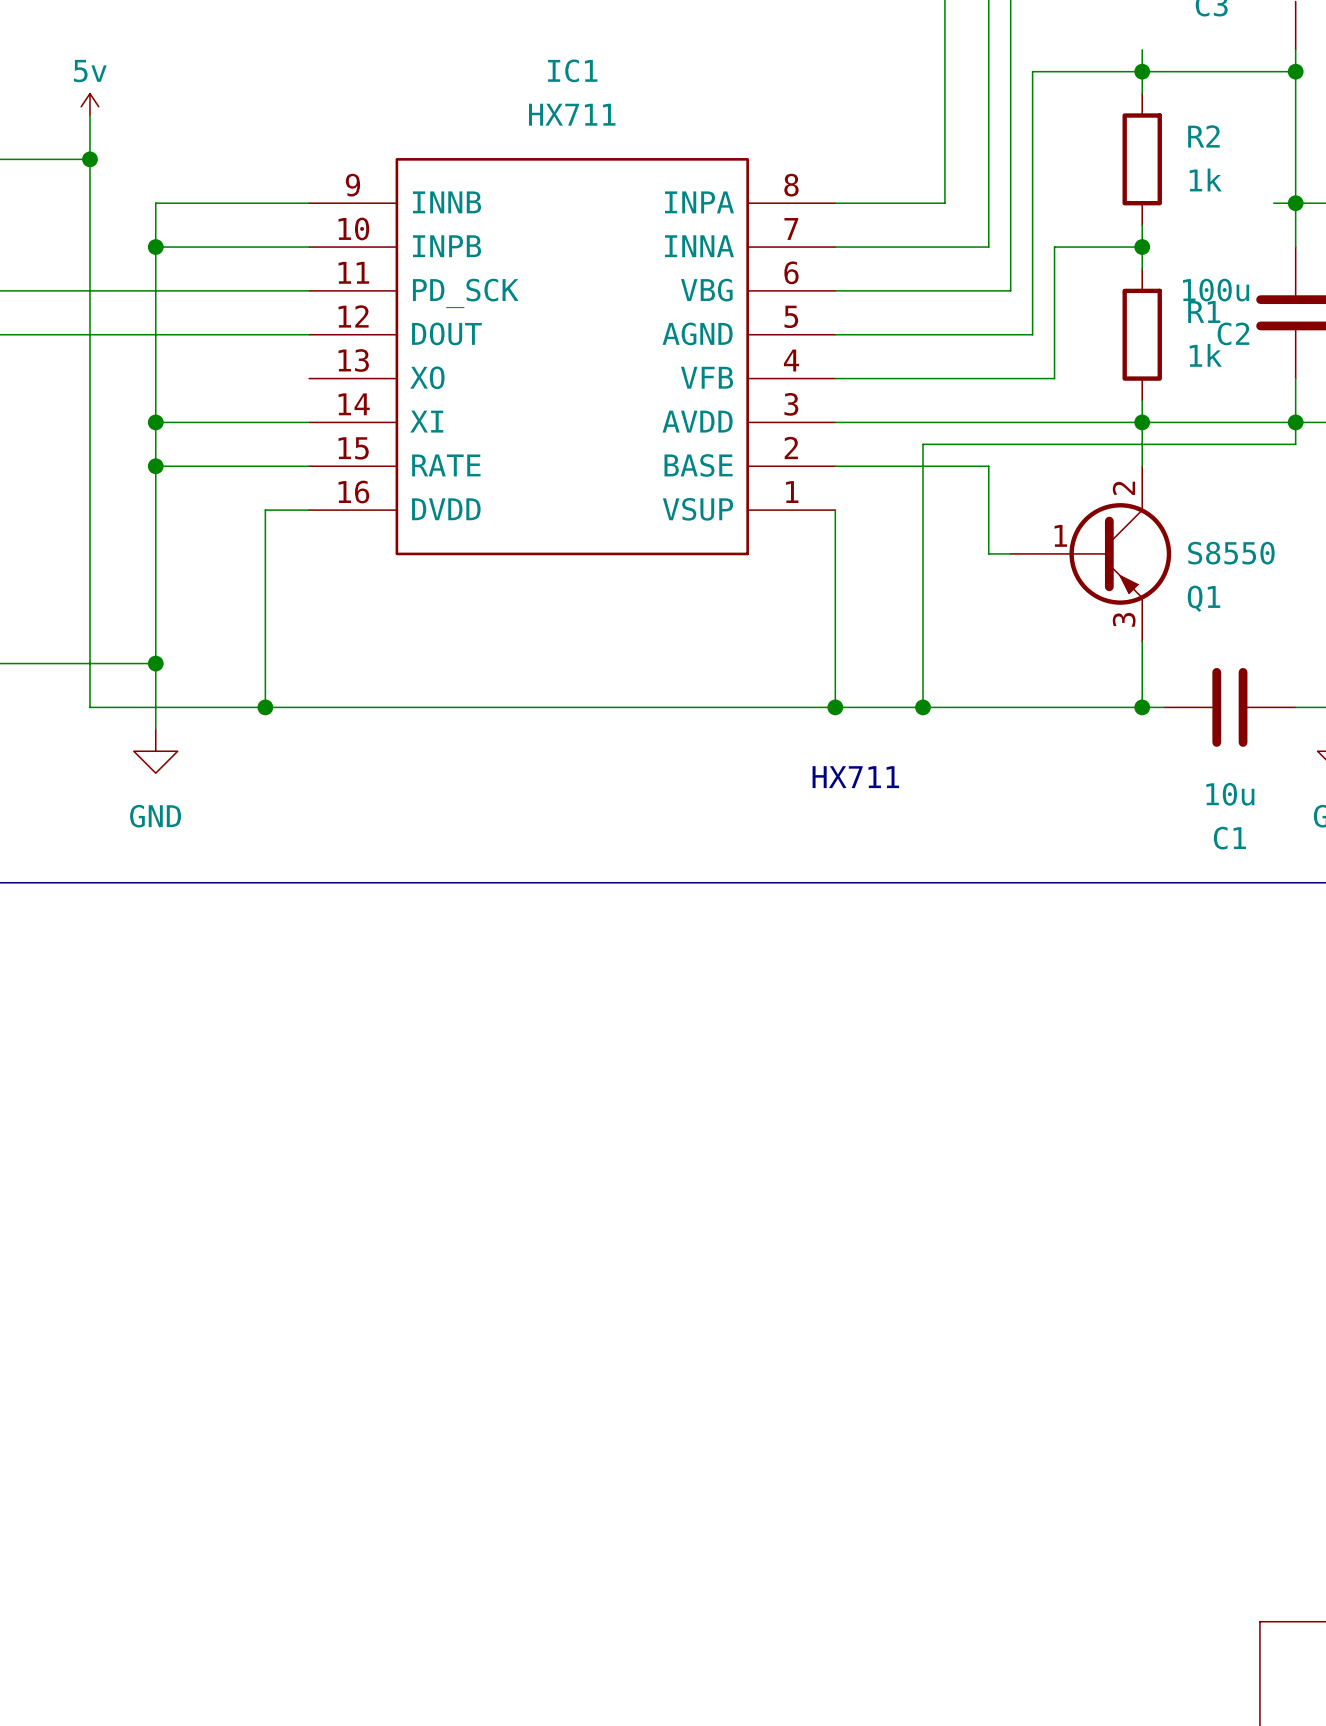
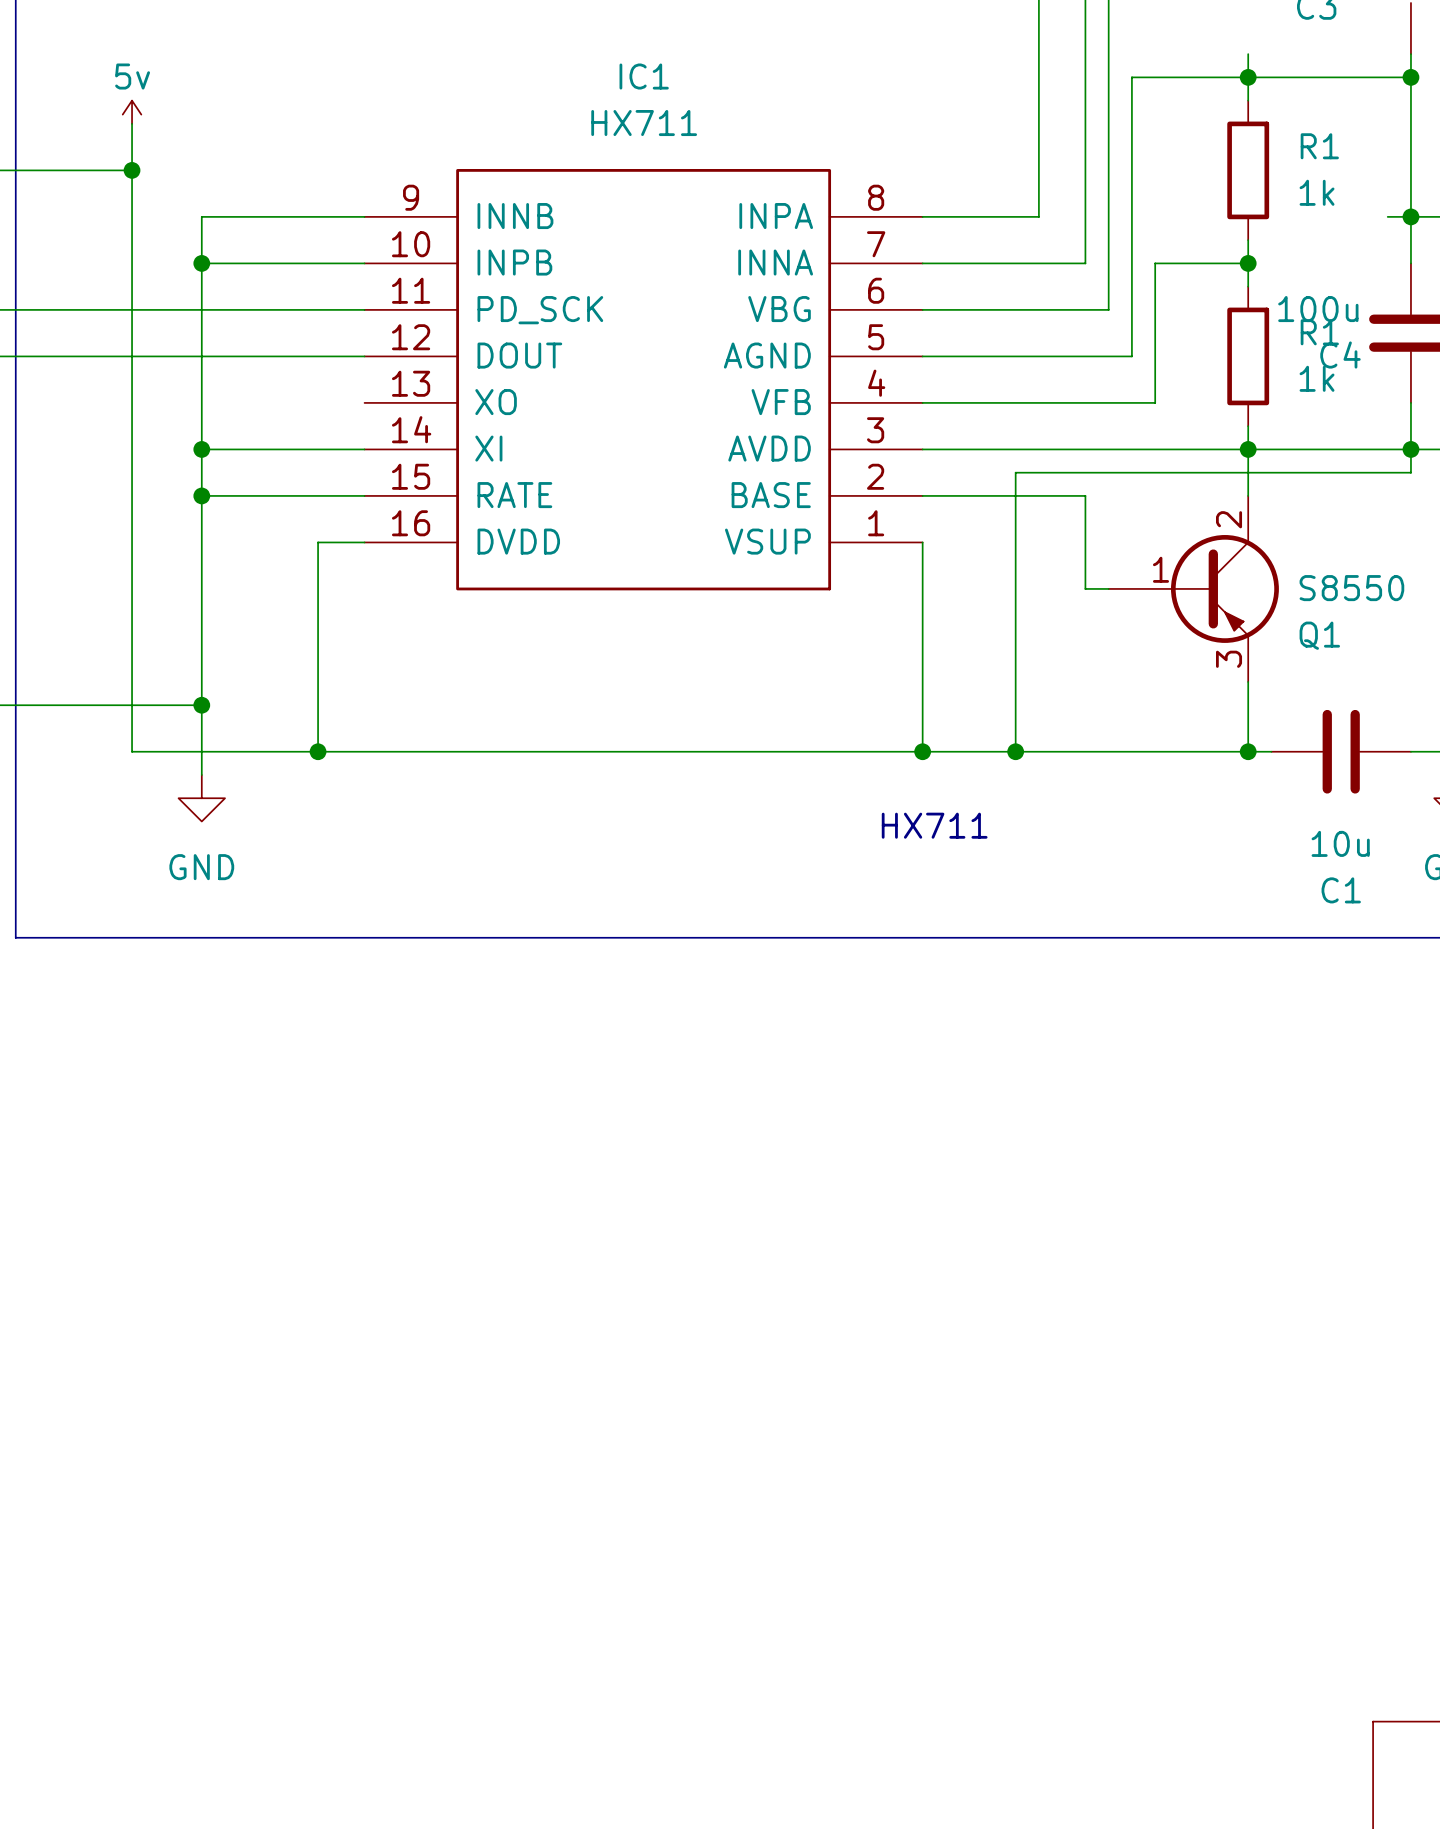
R2 name: R2 (1203, 136) -> R1 (1319, 146)
C2 name: C2 (1233, 333) -> C4 (1340, 355)

